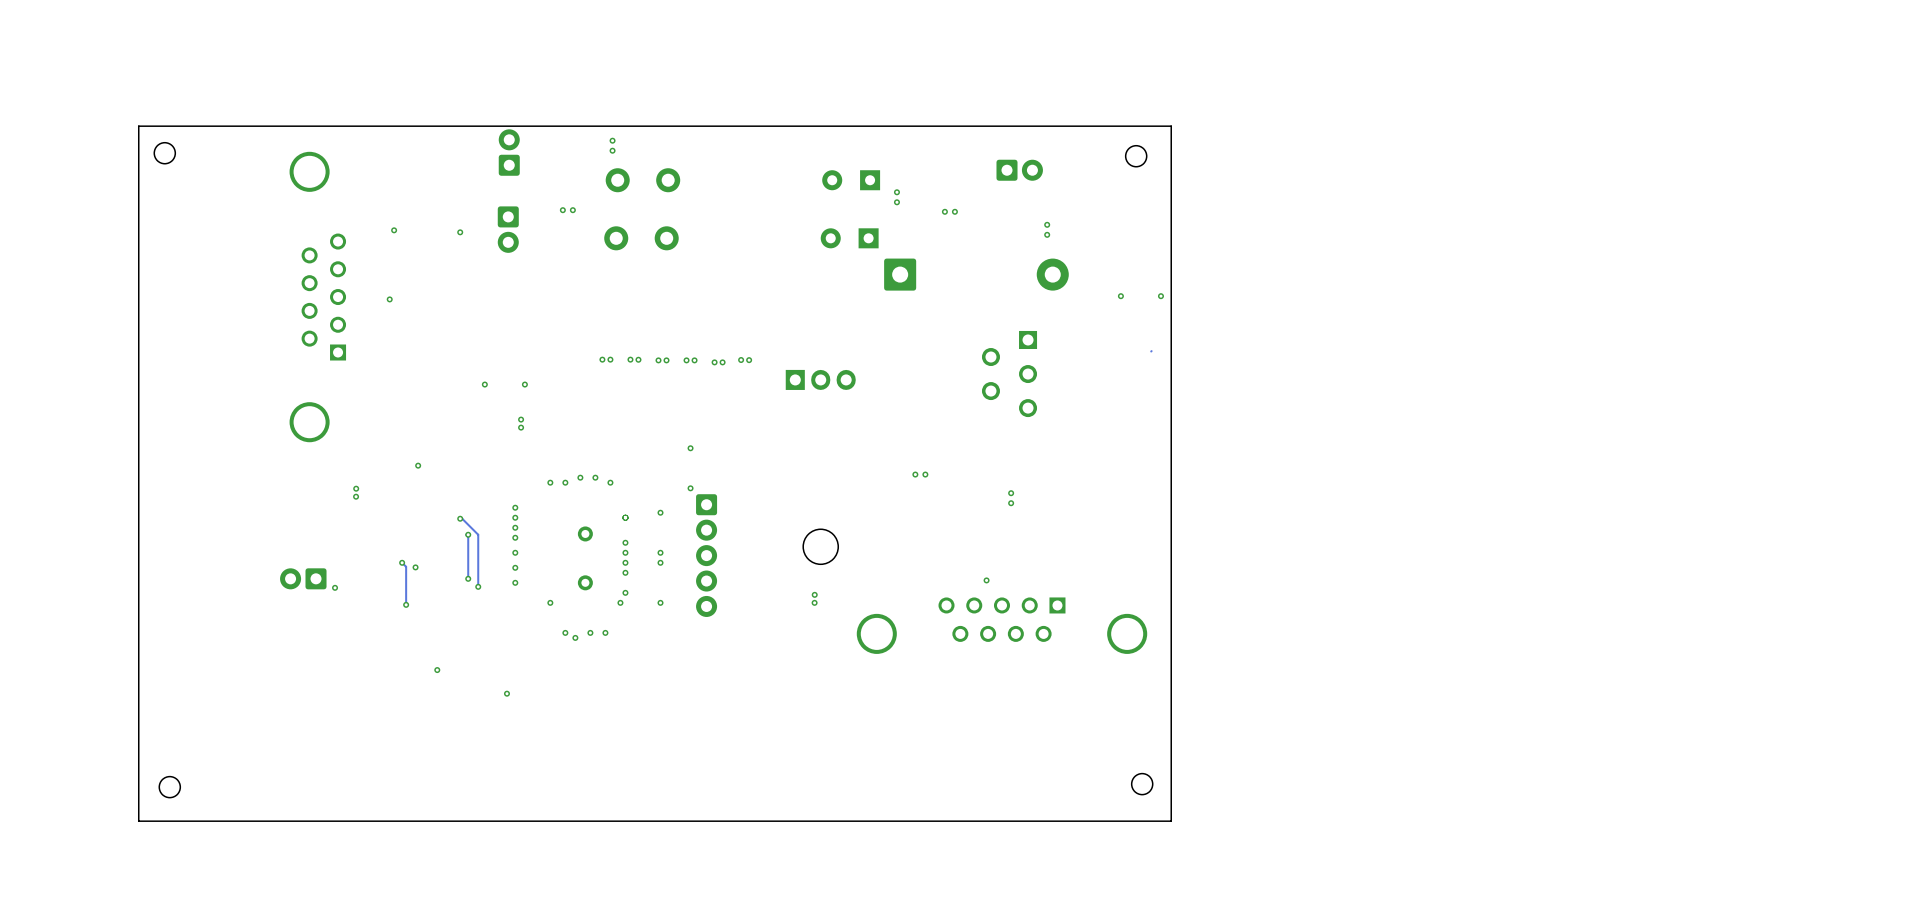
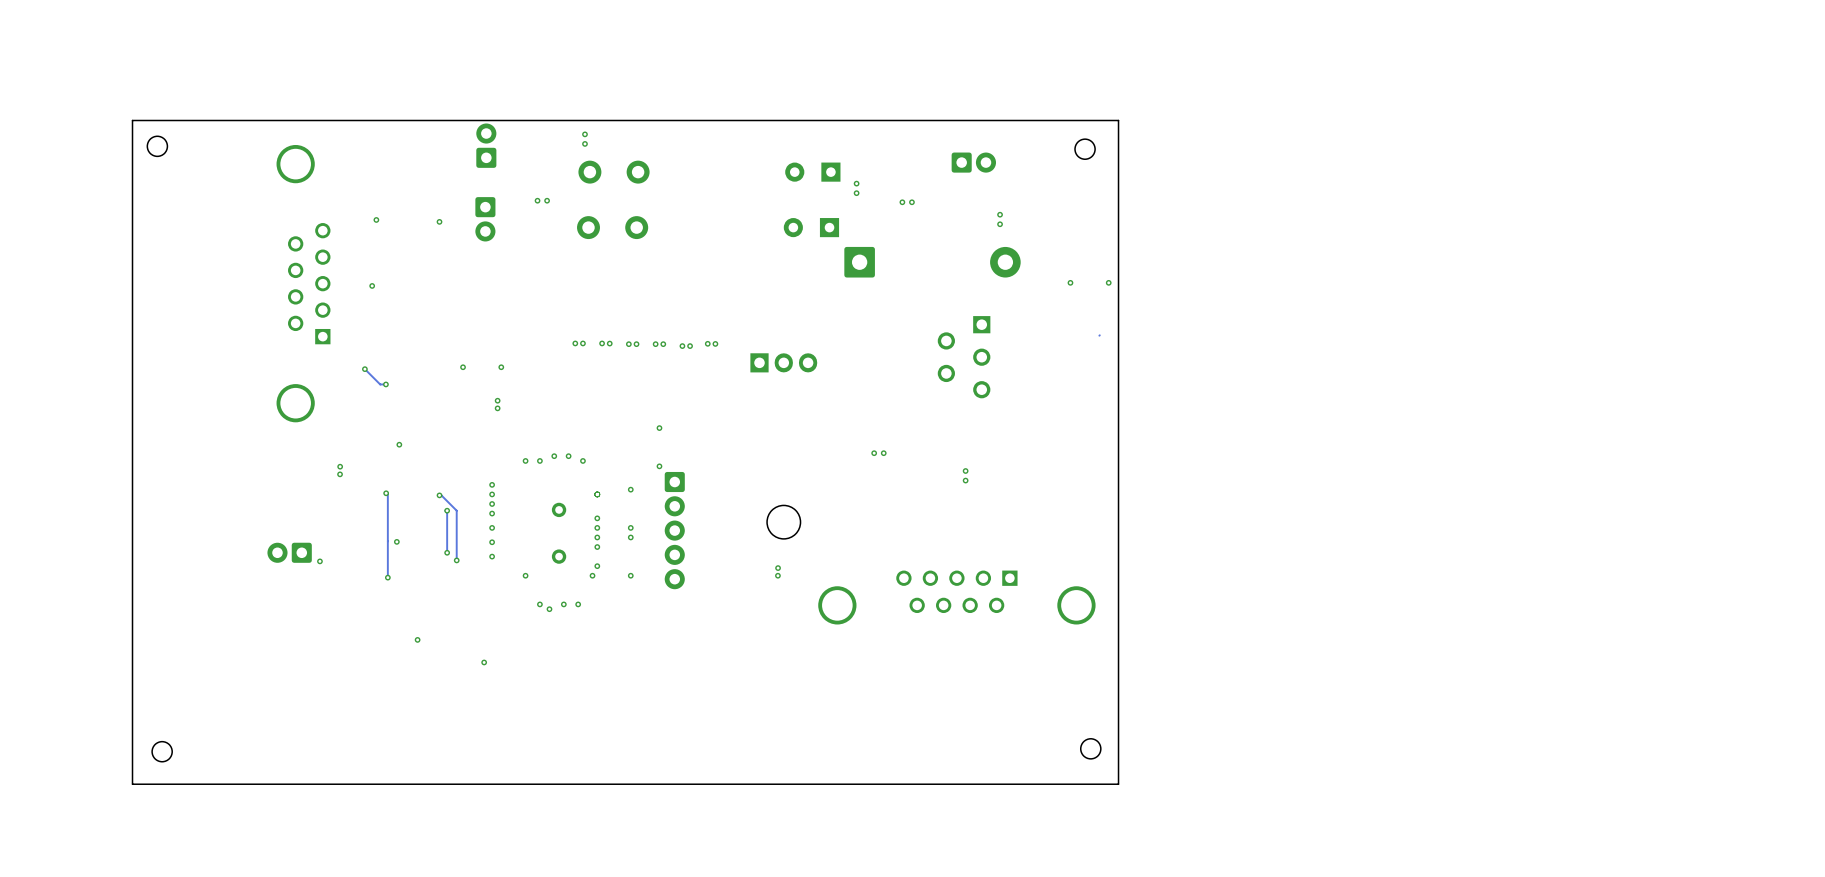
track: none -> (364, 369) (380, 384) (385, 384)
via: none -> (364, 369)
via: none -> (385, 384)
track: (402, 562) (406, 566) -> (386, 493) (387, 493) (387, 541)
via position: (402, 562) -> (386, 493)
via: (986, 580) -> none

